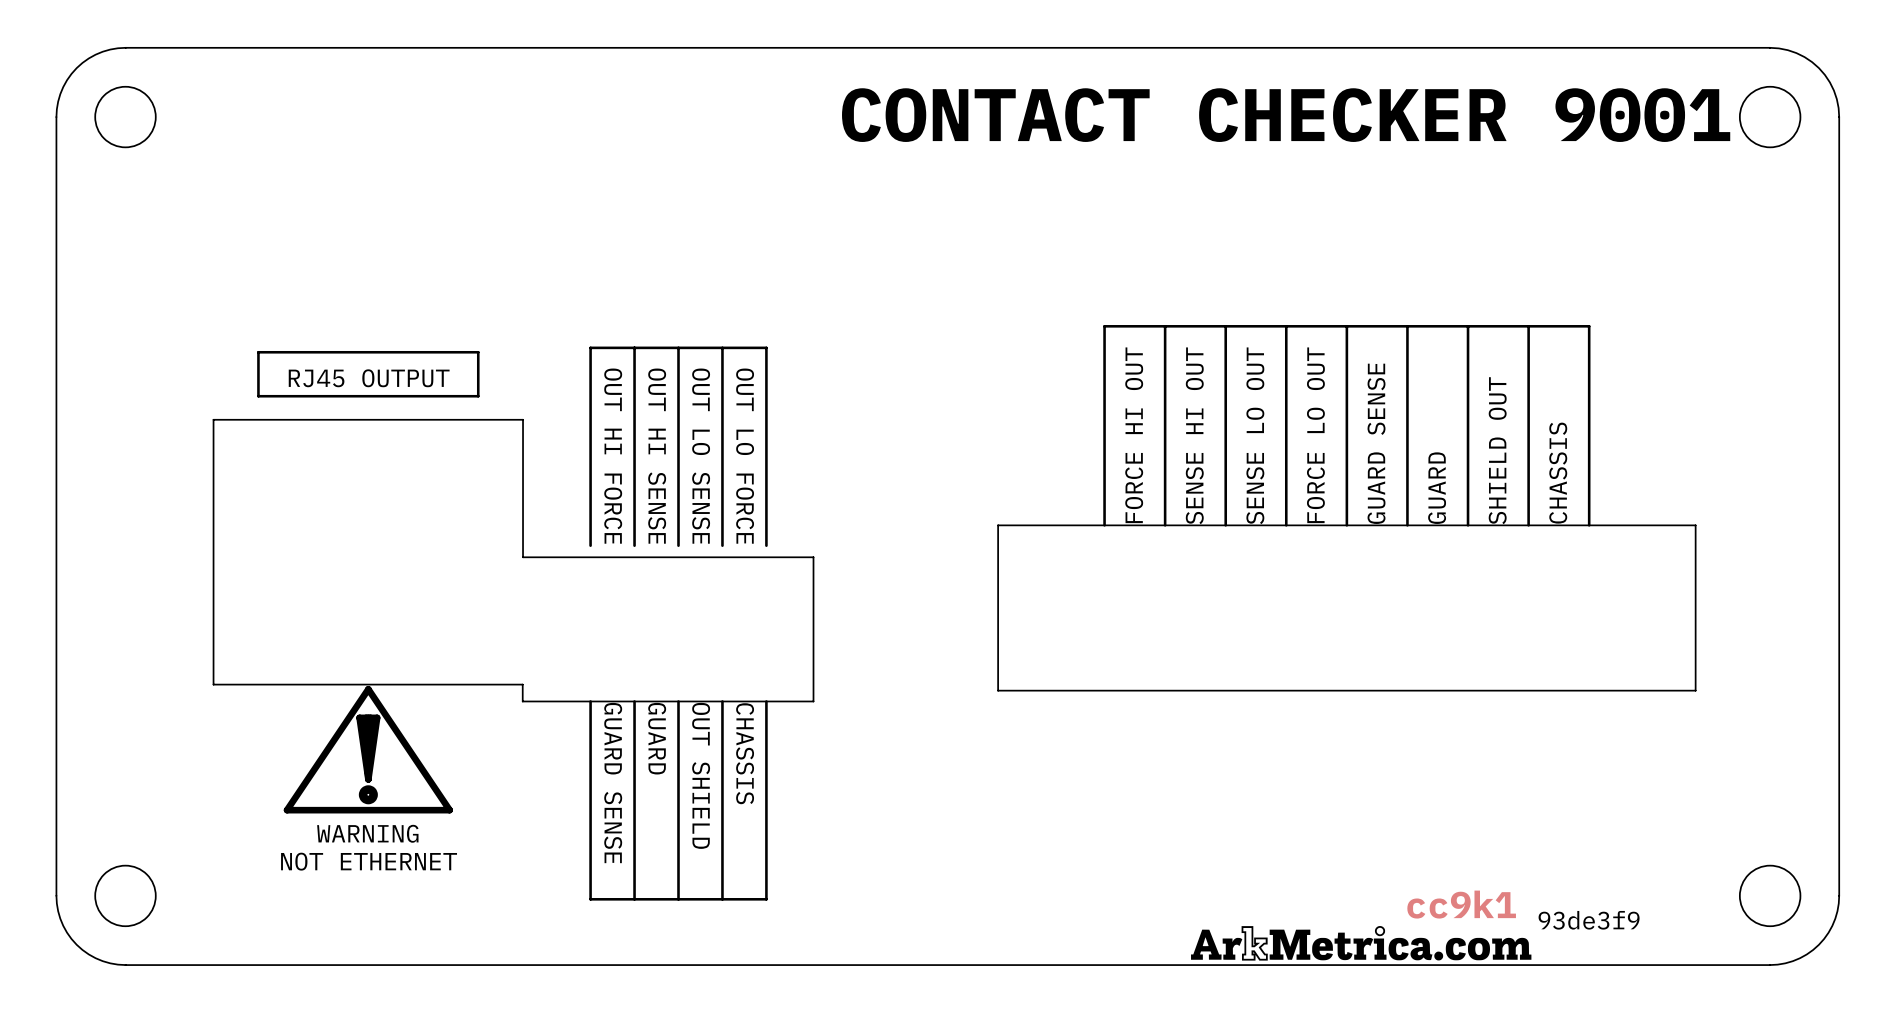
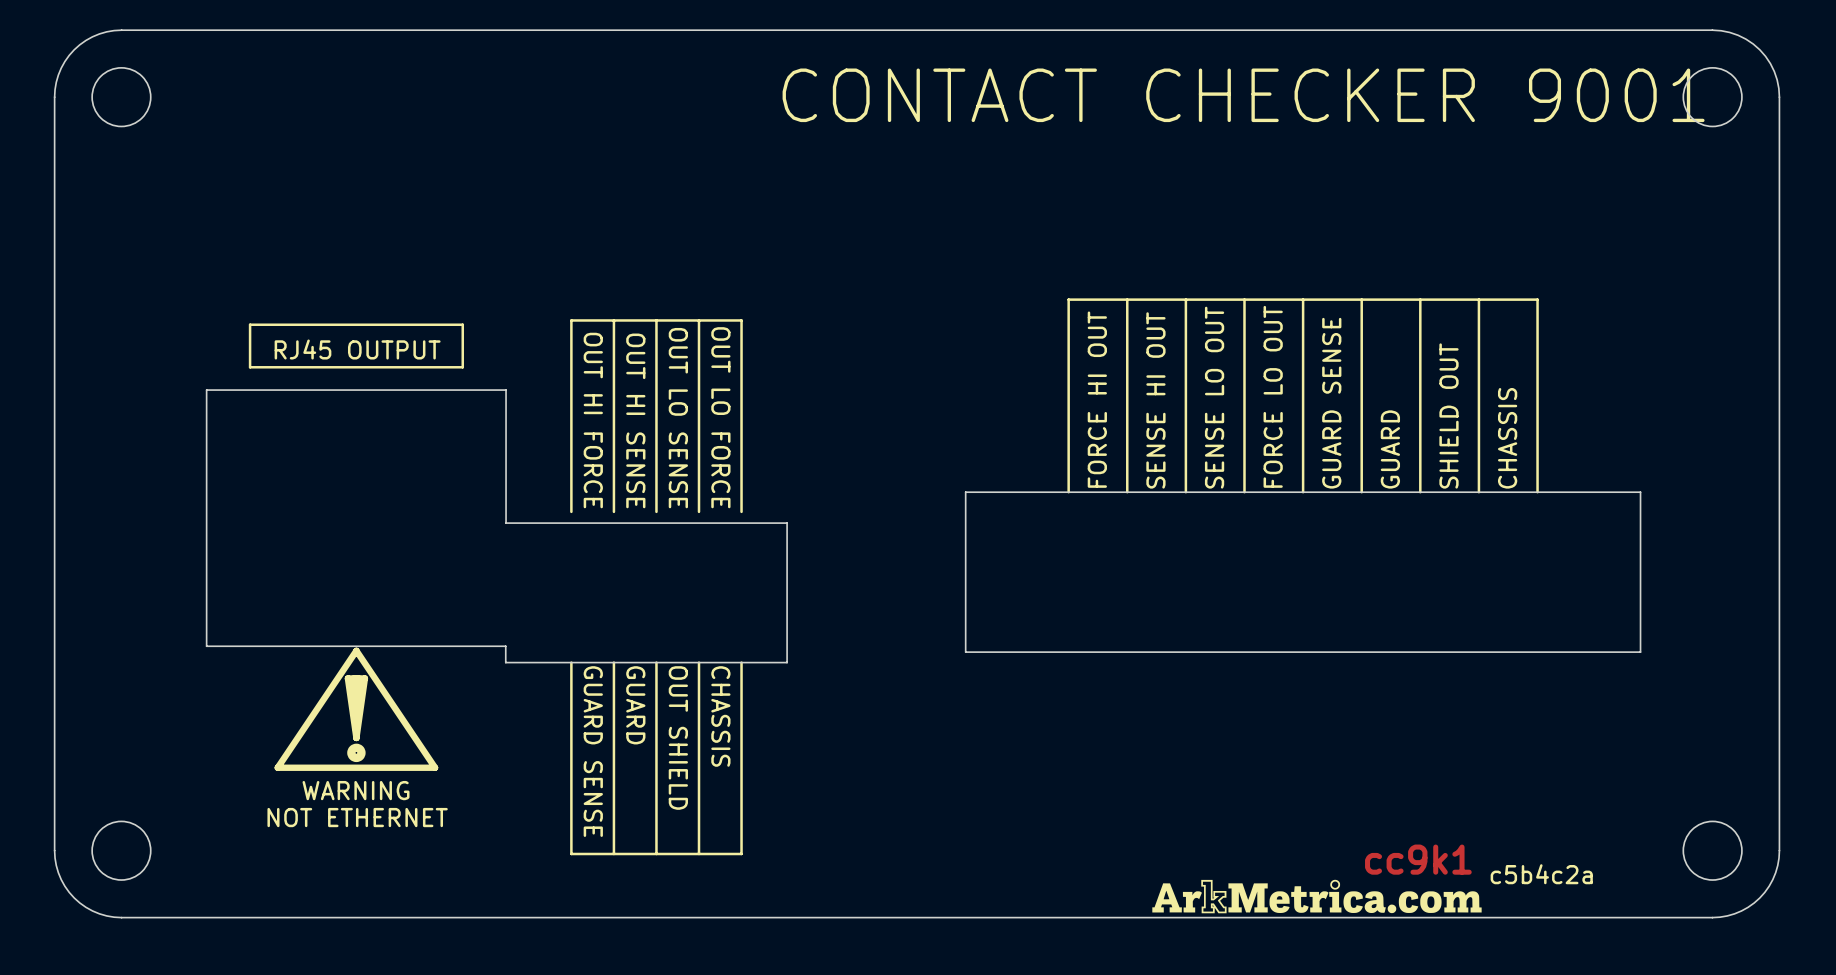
text: 93de3f9 (1589, 920) -> c5b4c2a (1541, 874)

